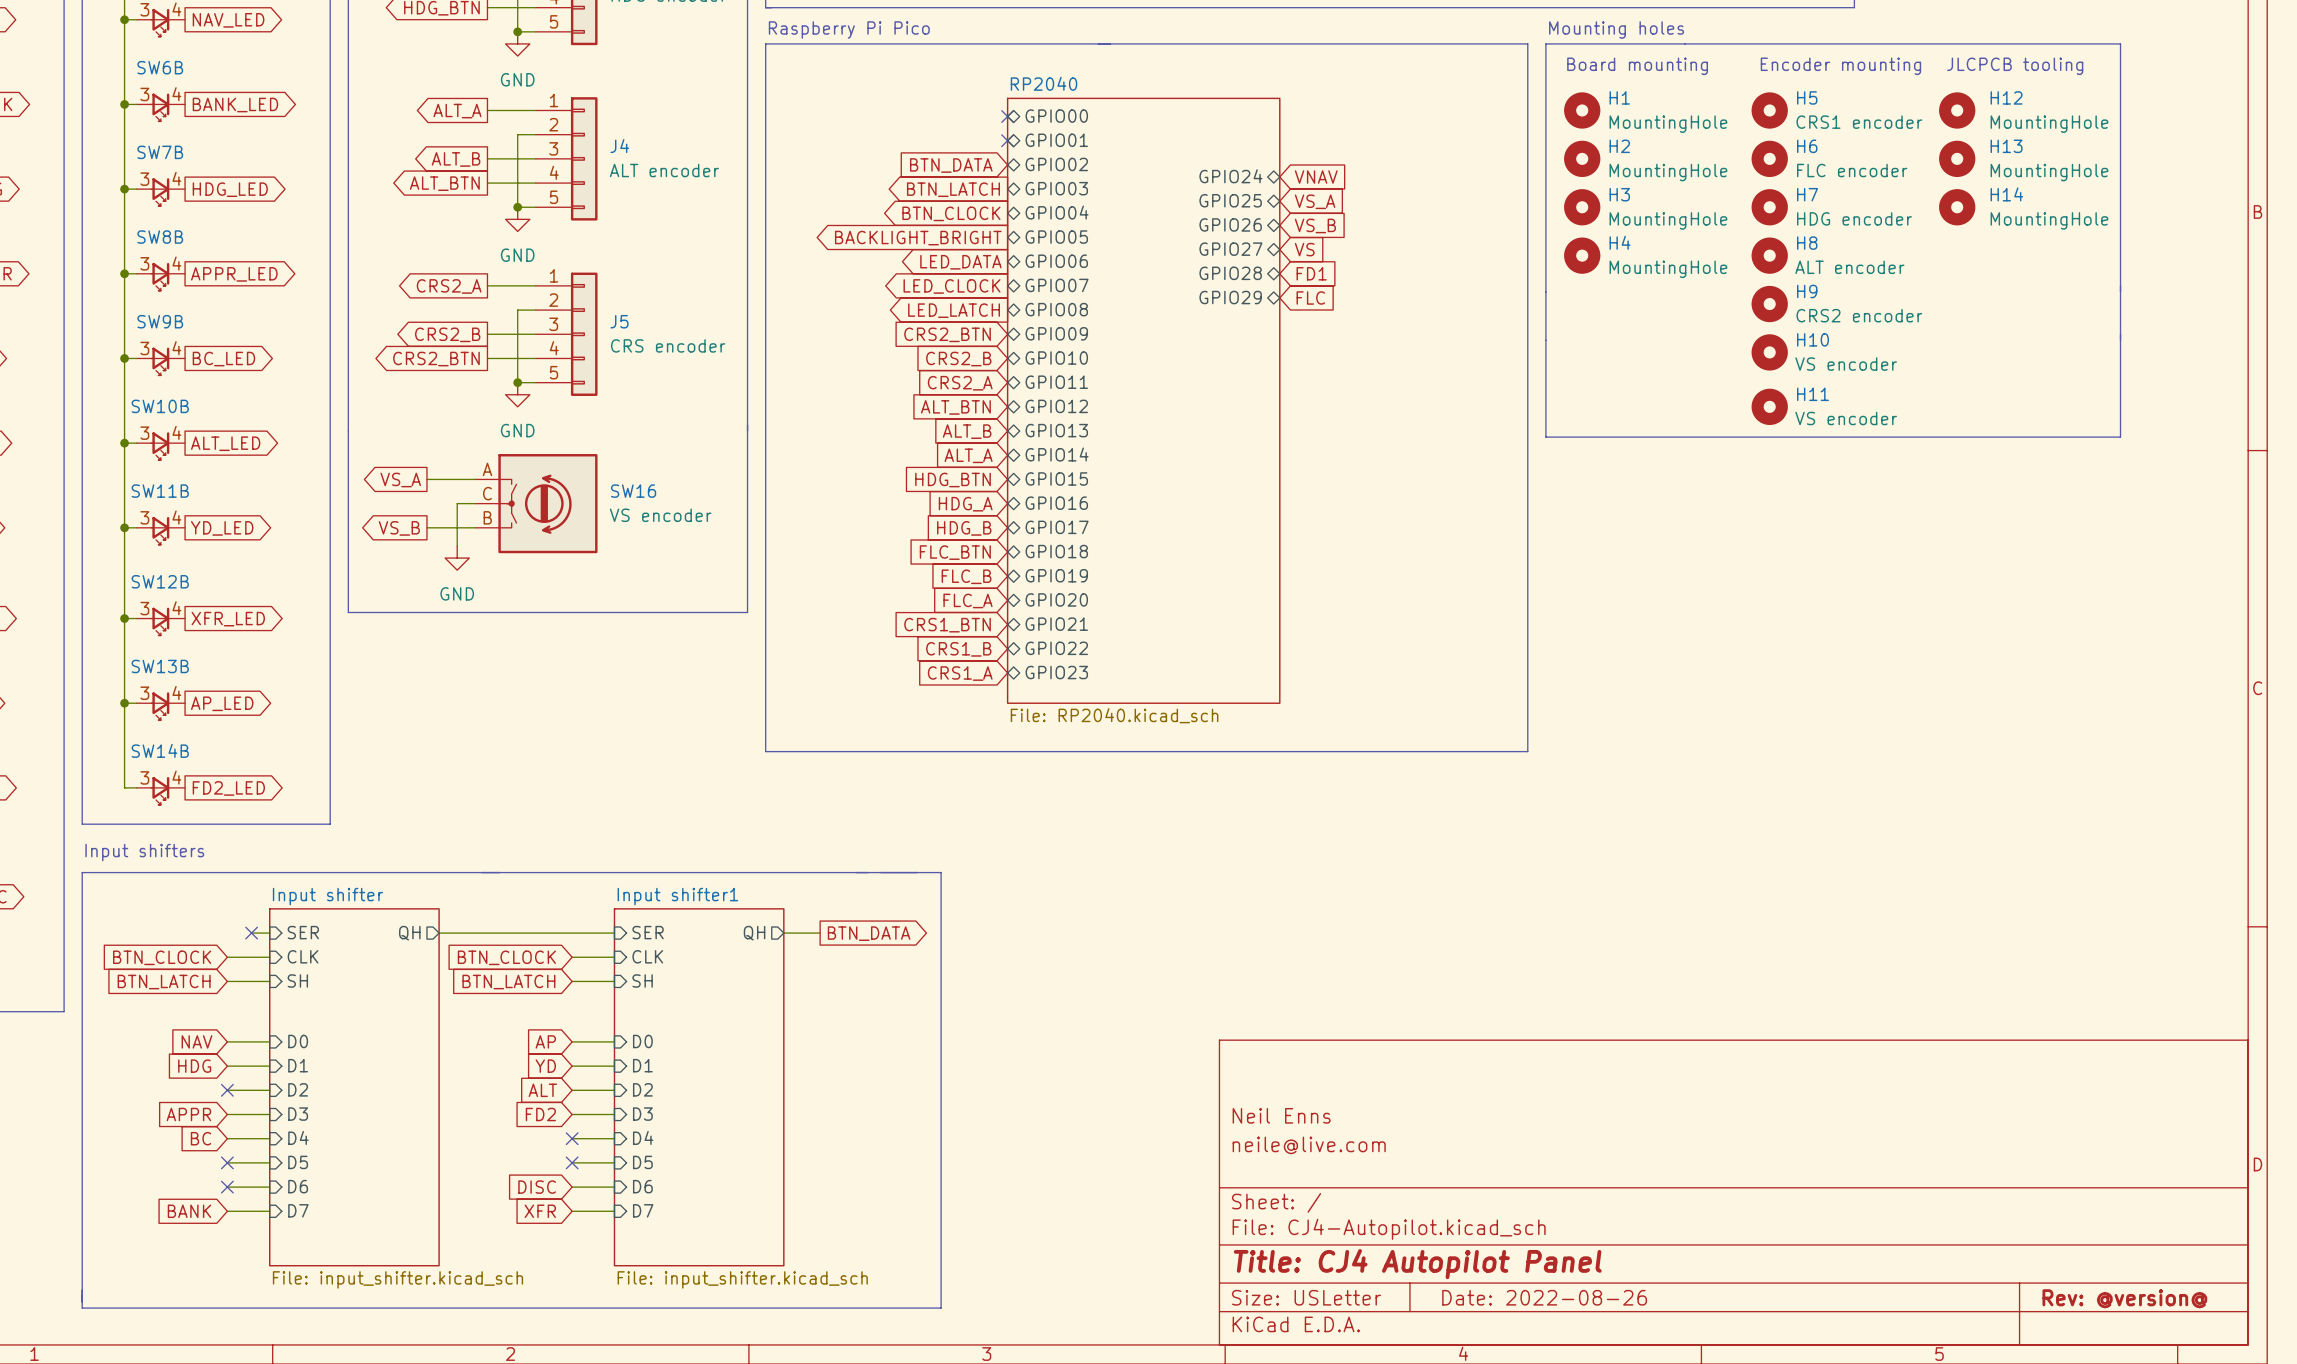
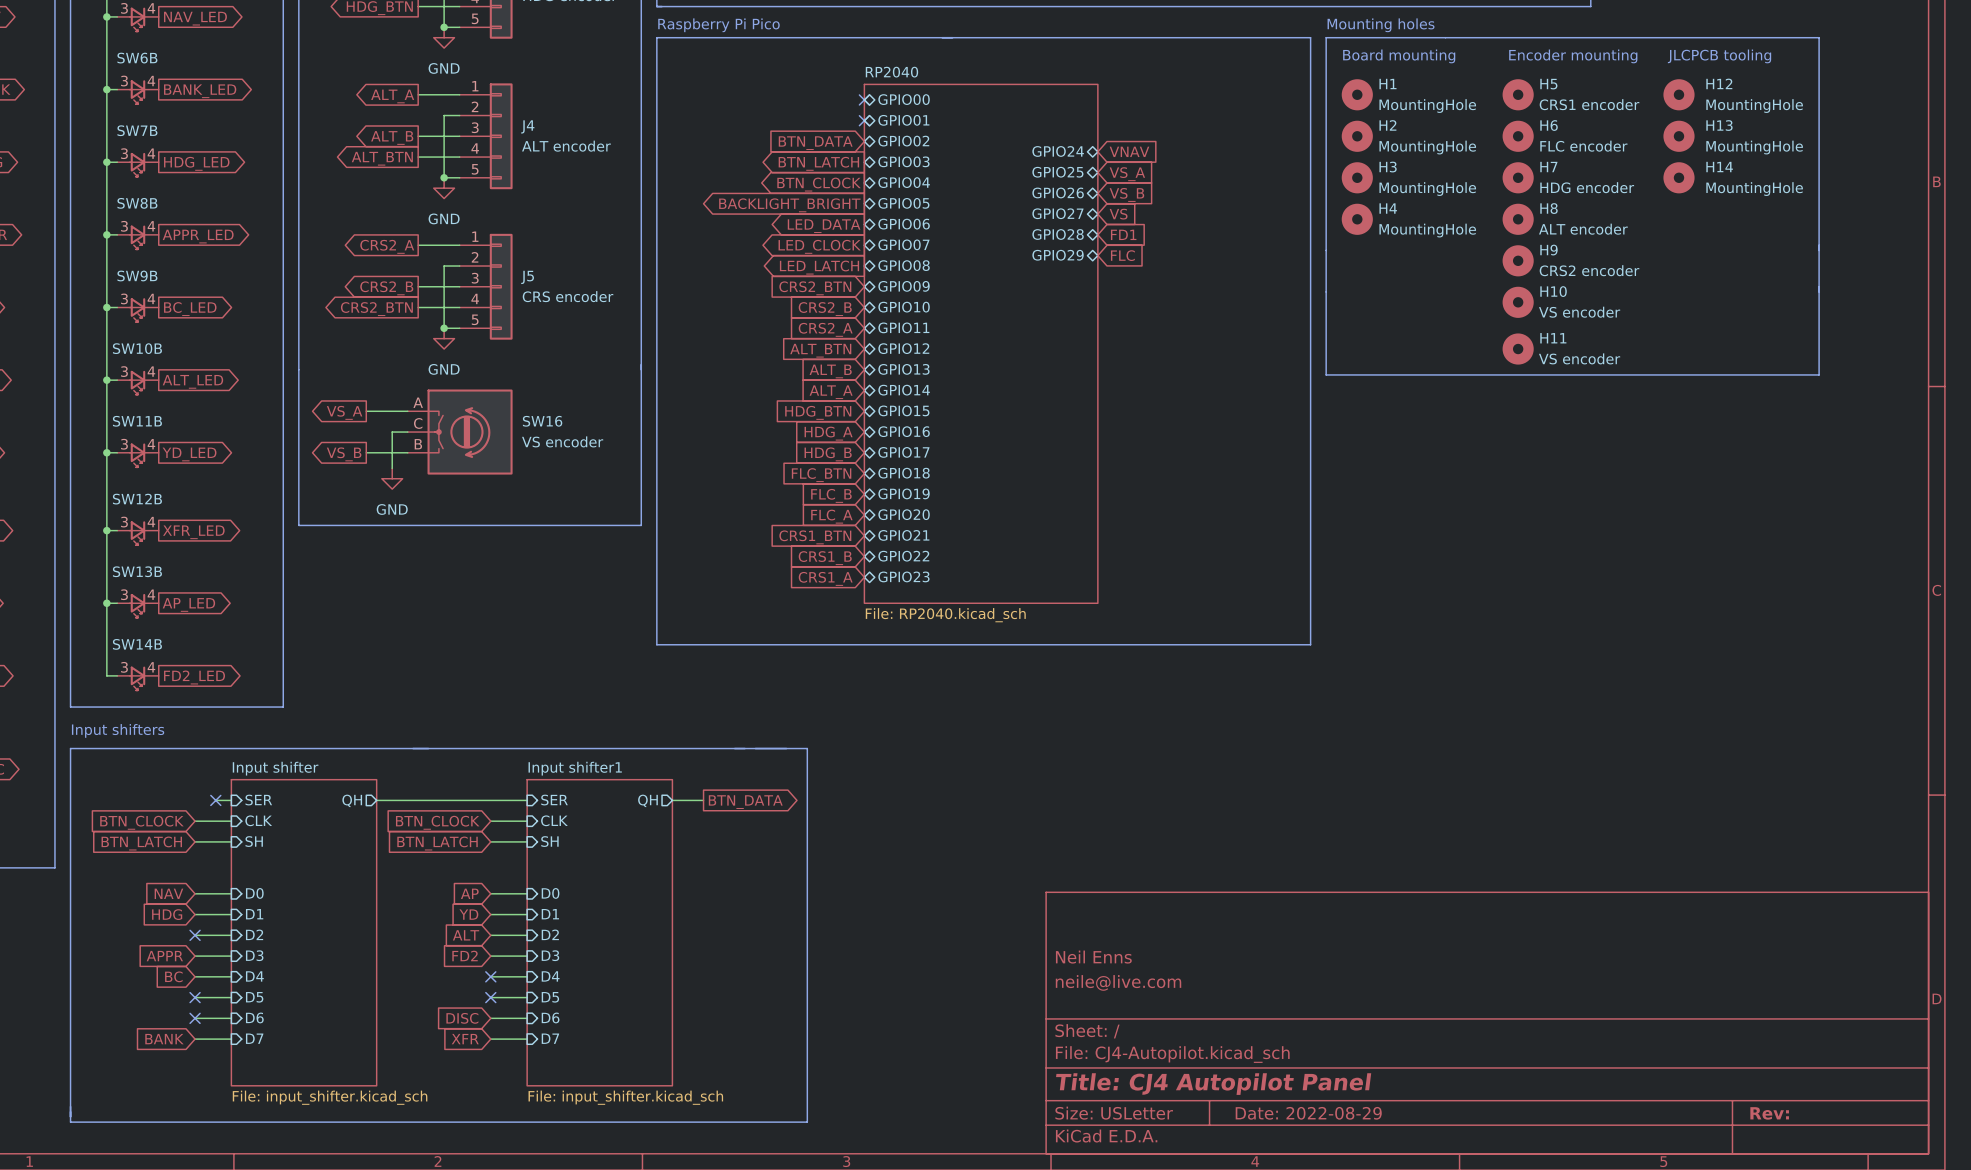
title block: Date: 2022-08-26 (1544, 1297) -> Date: 2022-08-29 (1308, 1113)
title block: Rev: @version@ (2124, 1298) -> Rev: (1769, 1113)

